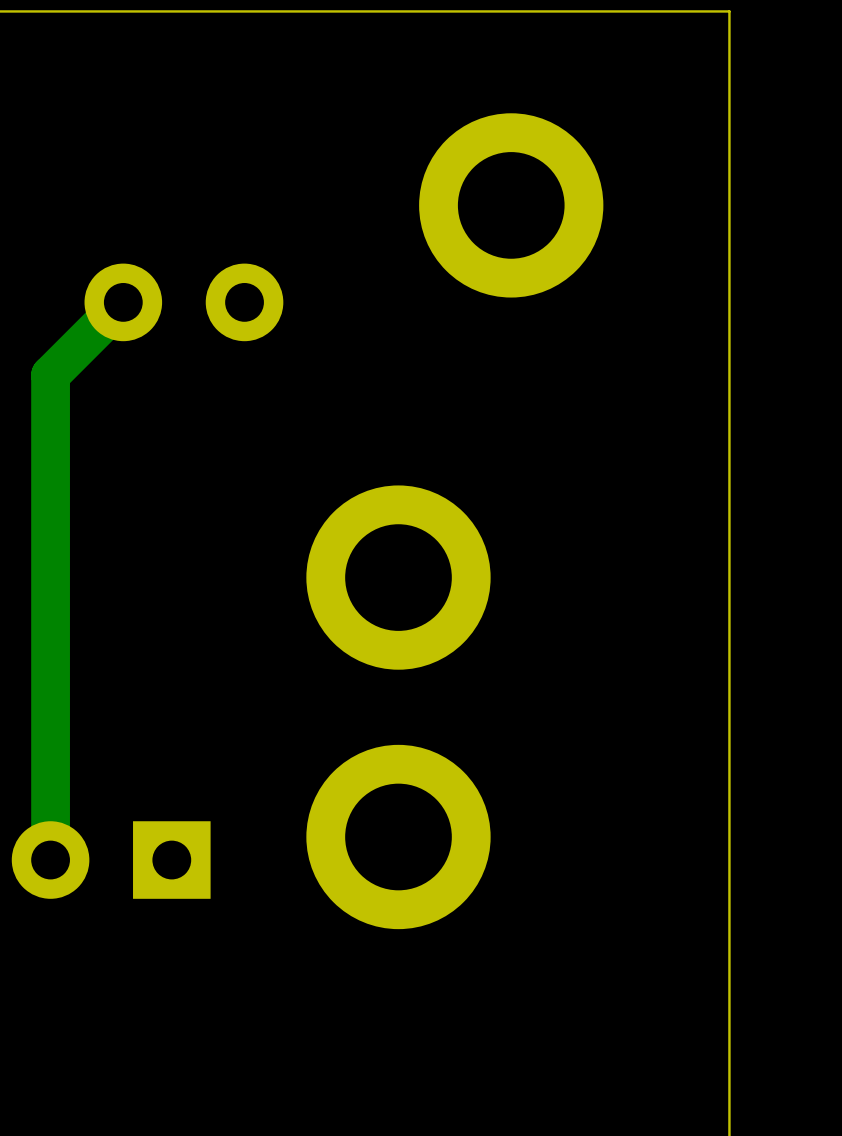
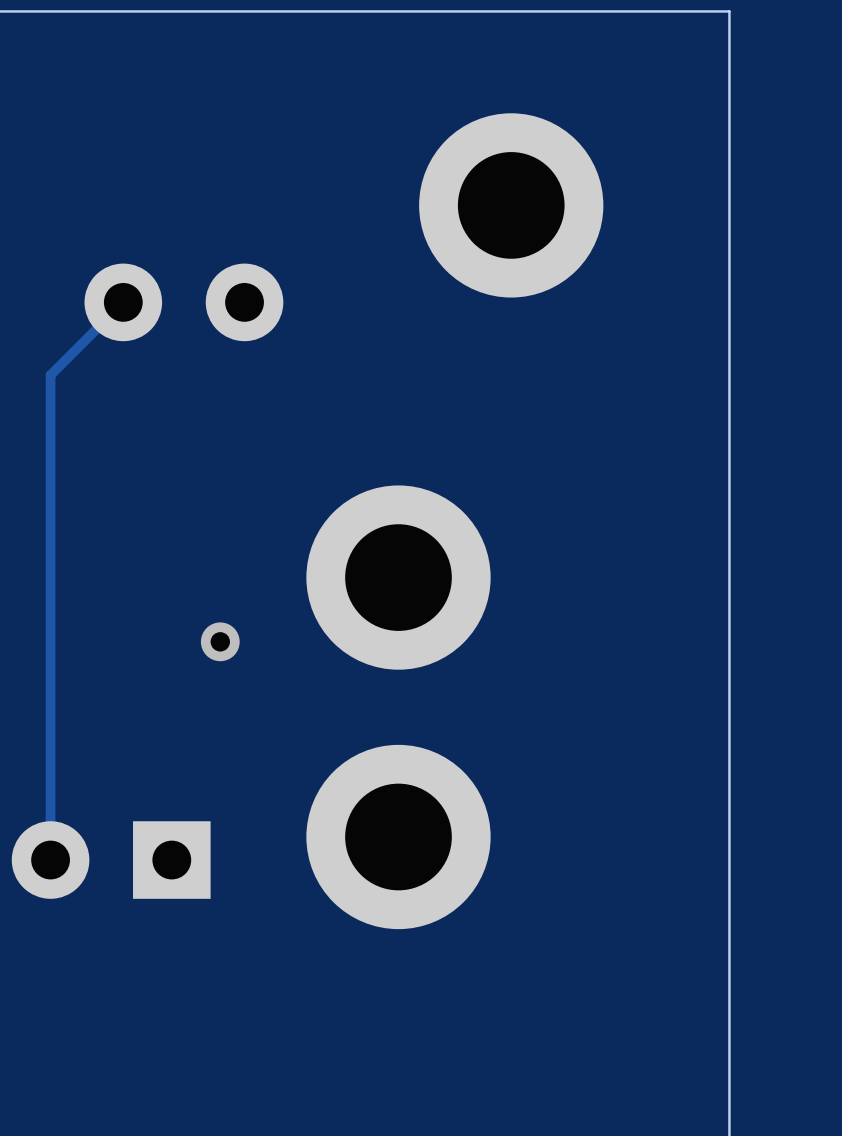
track width: thick (123, 302) (50, 375) (50, 860) -> thin (123, 302) (50, 375) (50, 860)
via: none -> (220, 641)

